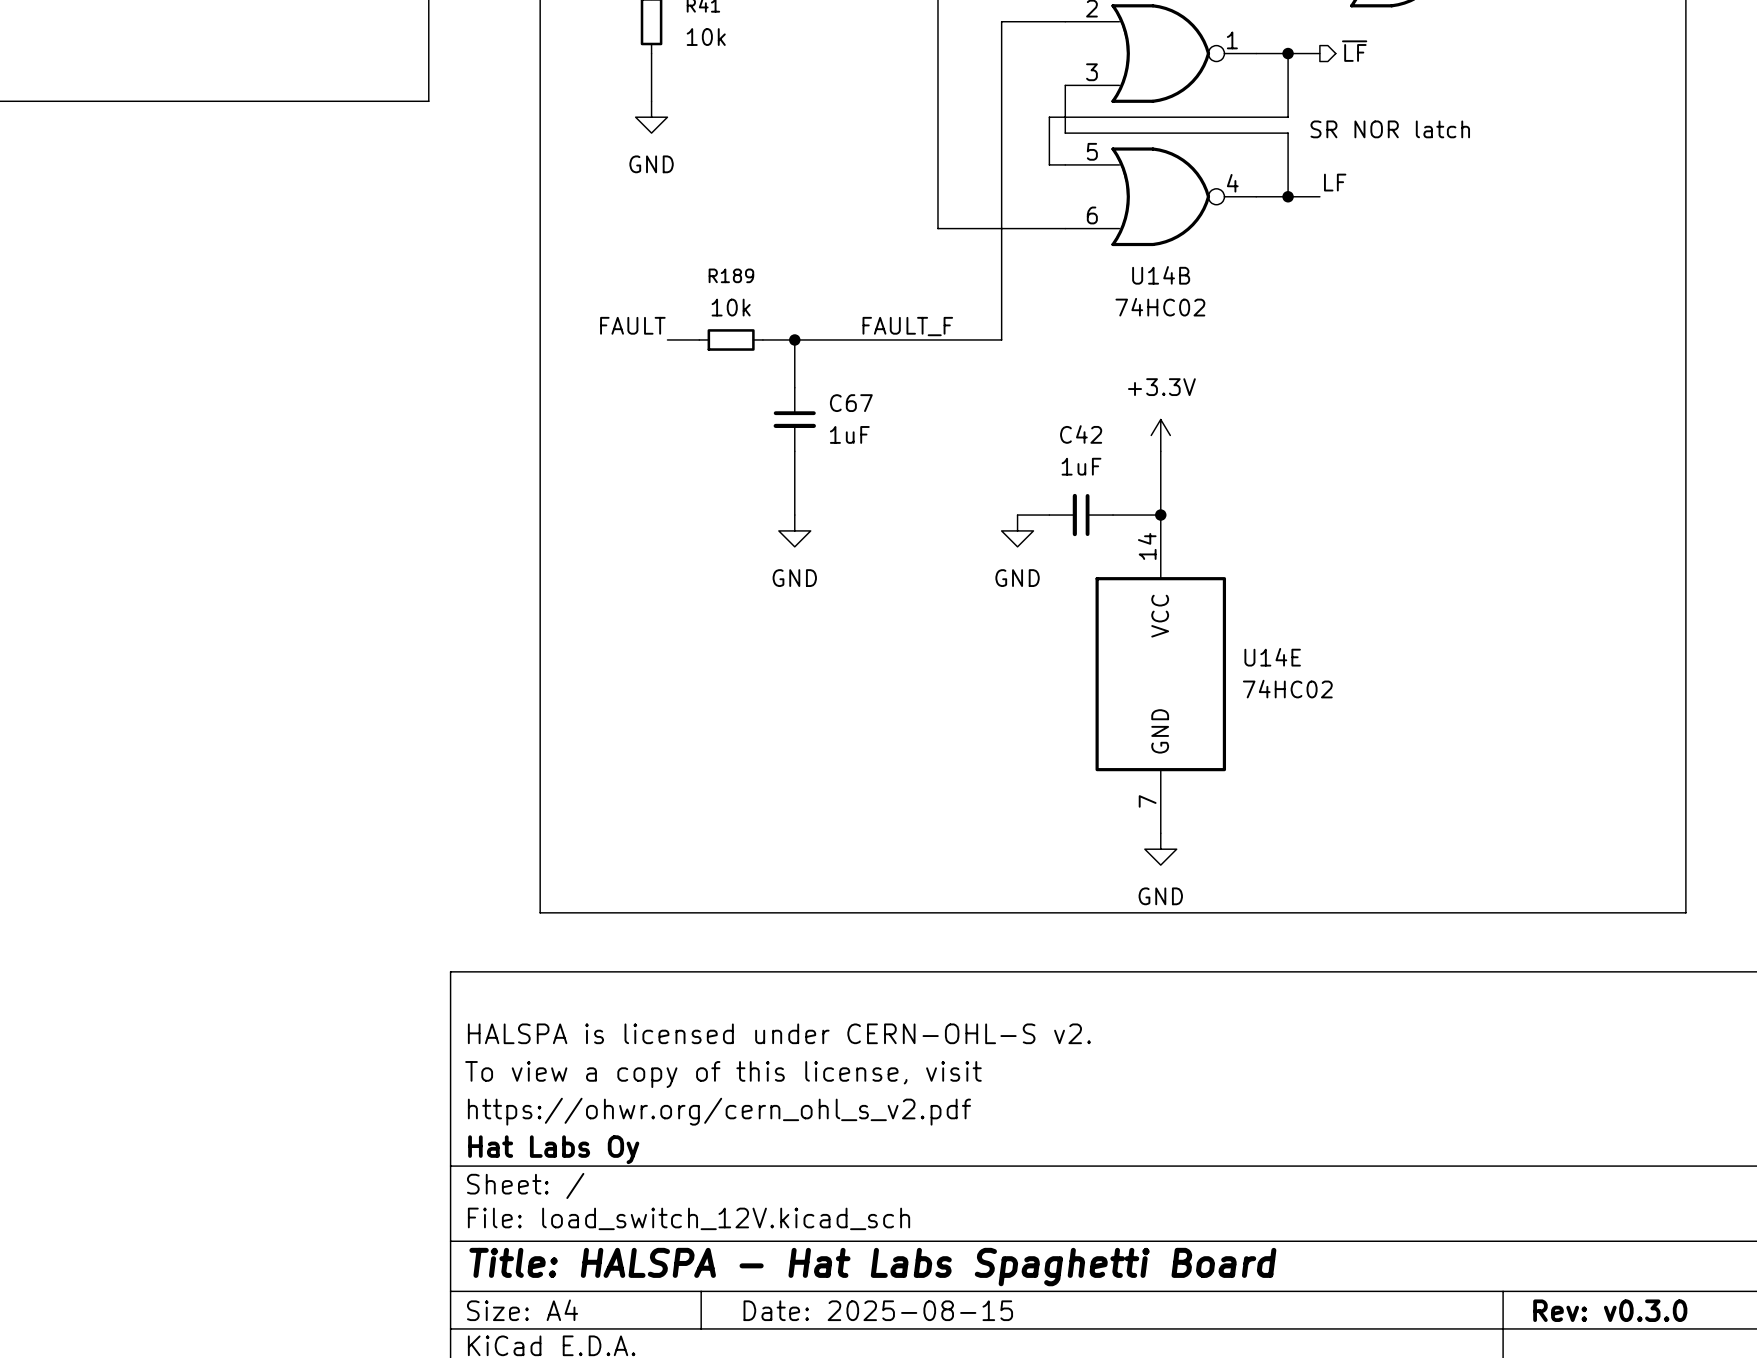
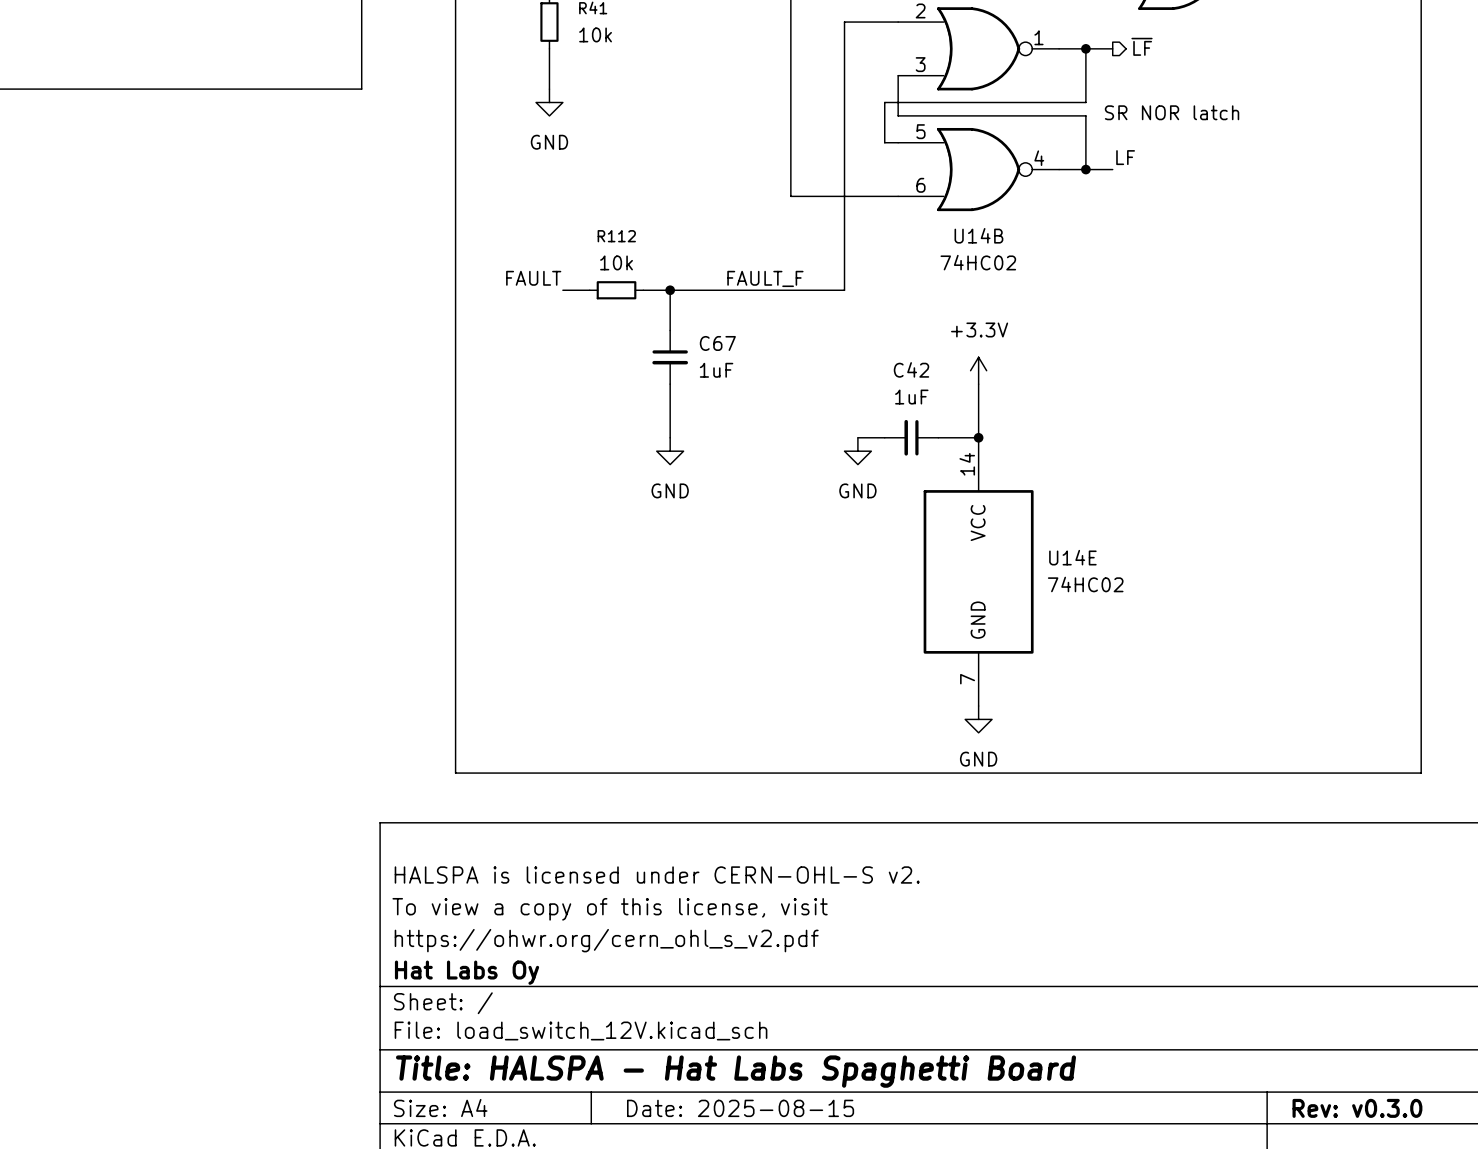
R189 name: R189 (731, 275) -> R112 (616, 236)

